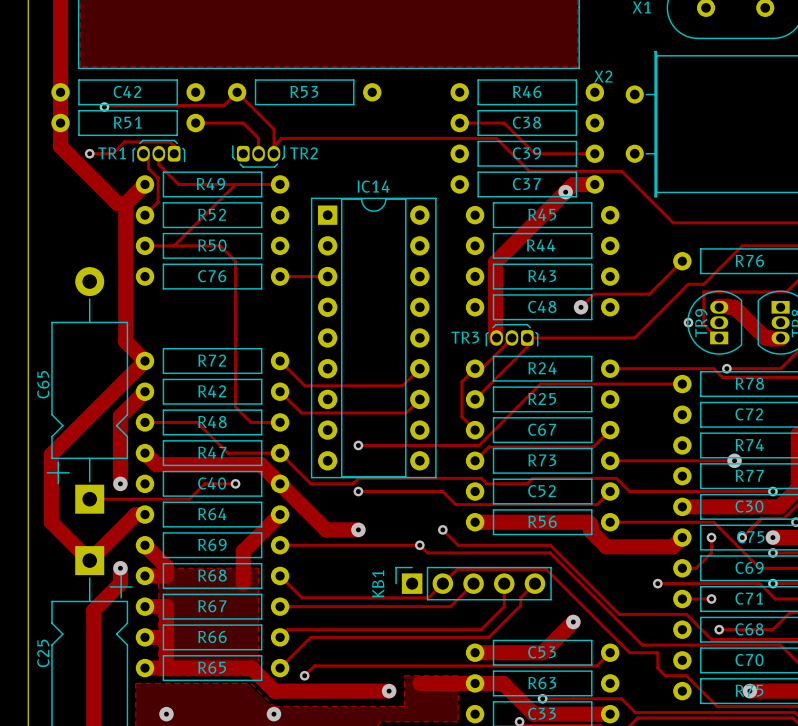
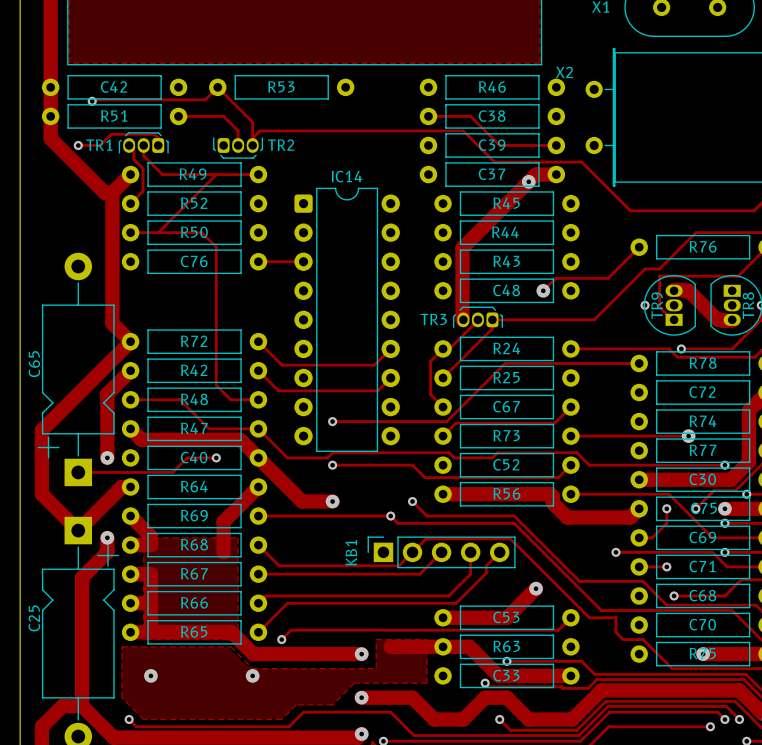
IC14 footprint: [310, 197, 437, 479] -> [294, 187, 400, 453]

